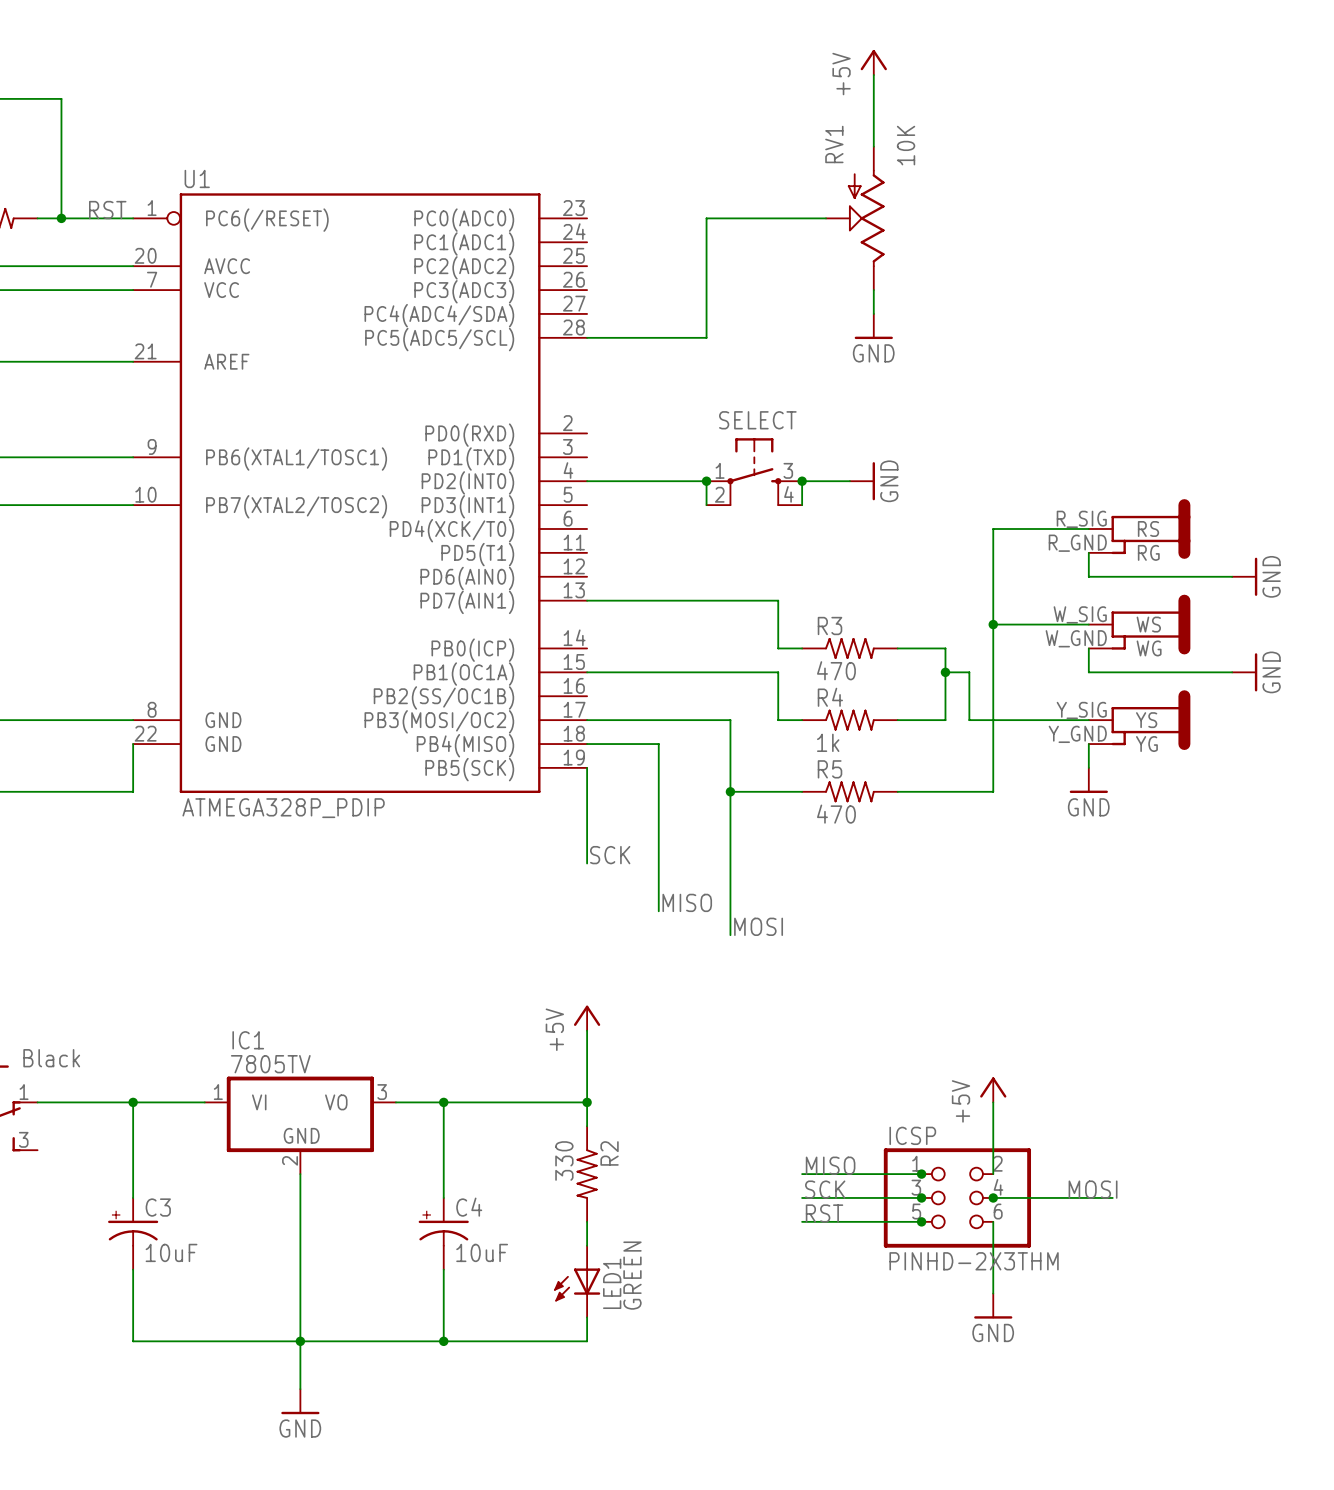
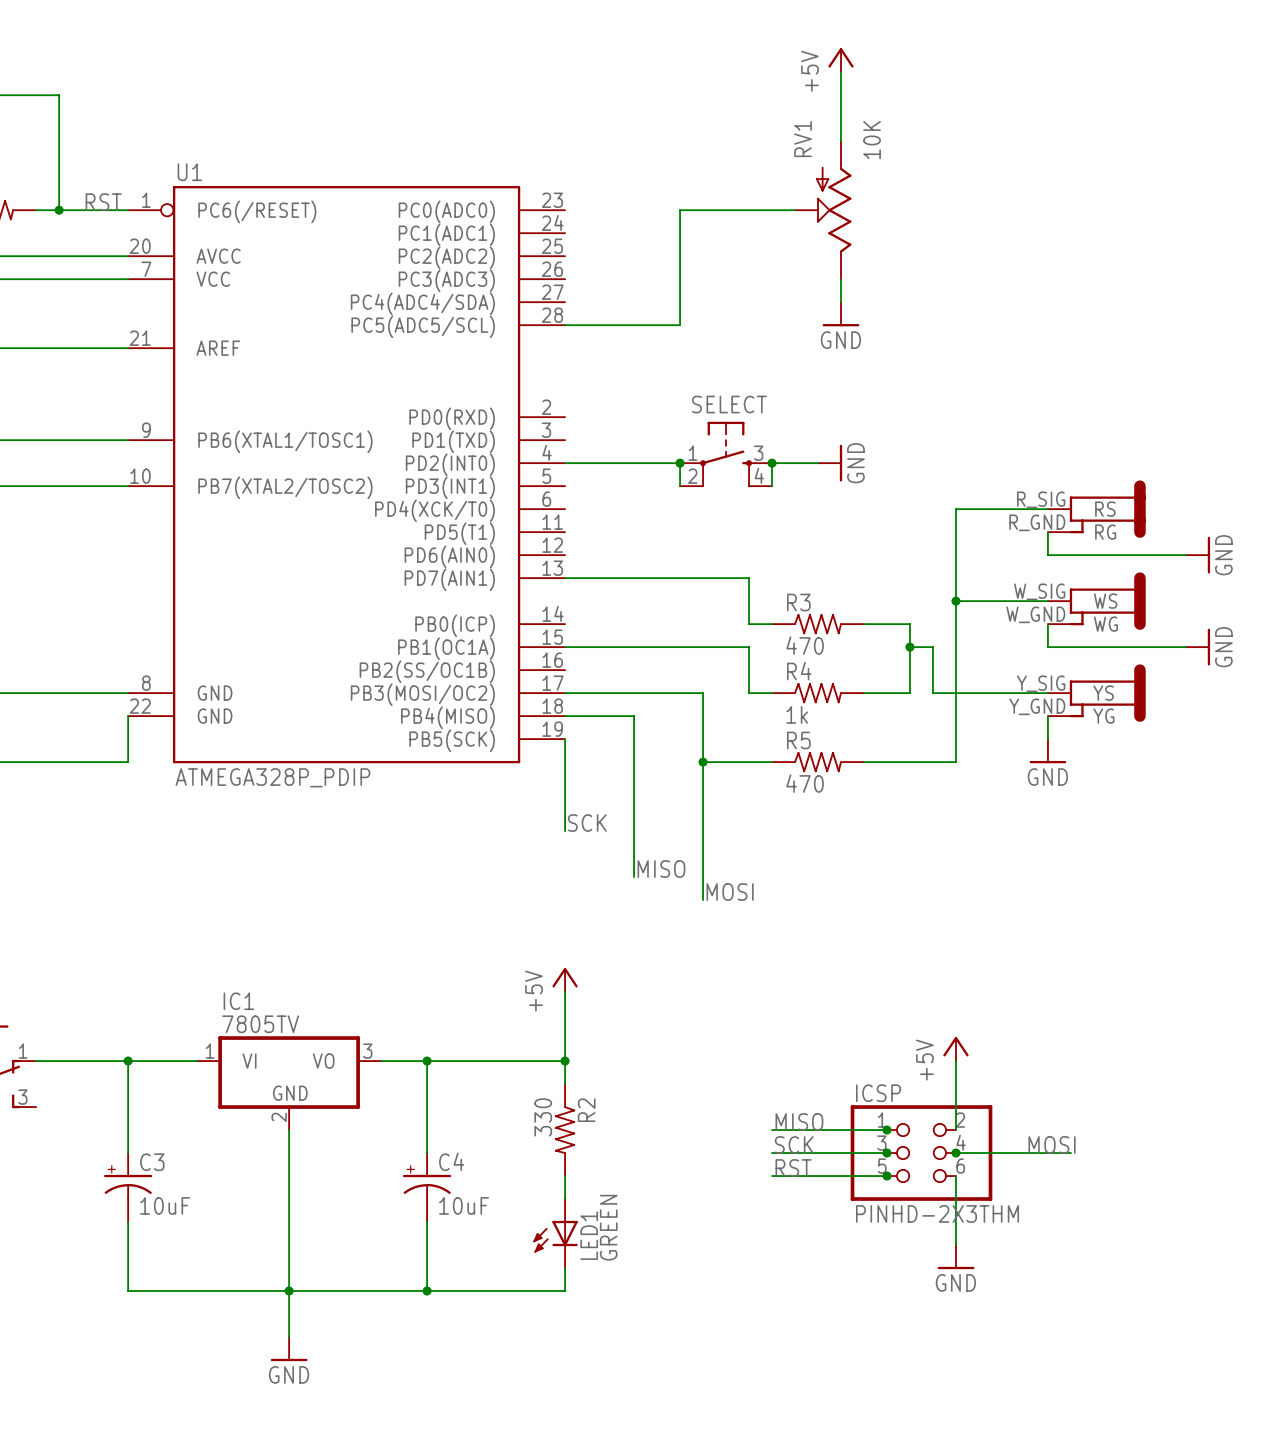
part value: Black (51, 1058) -> none

